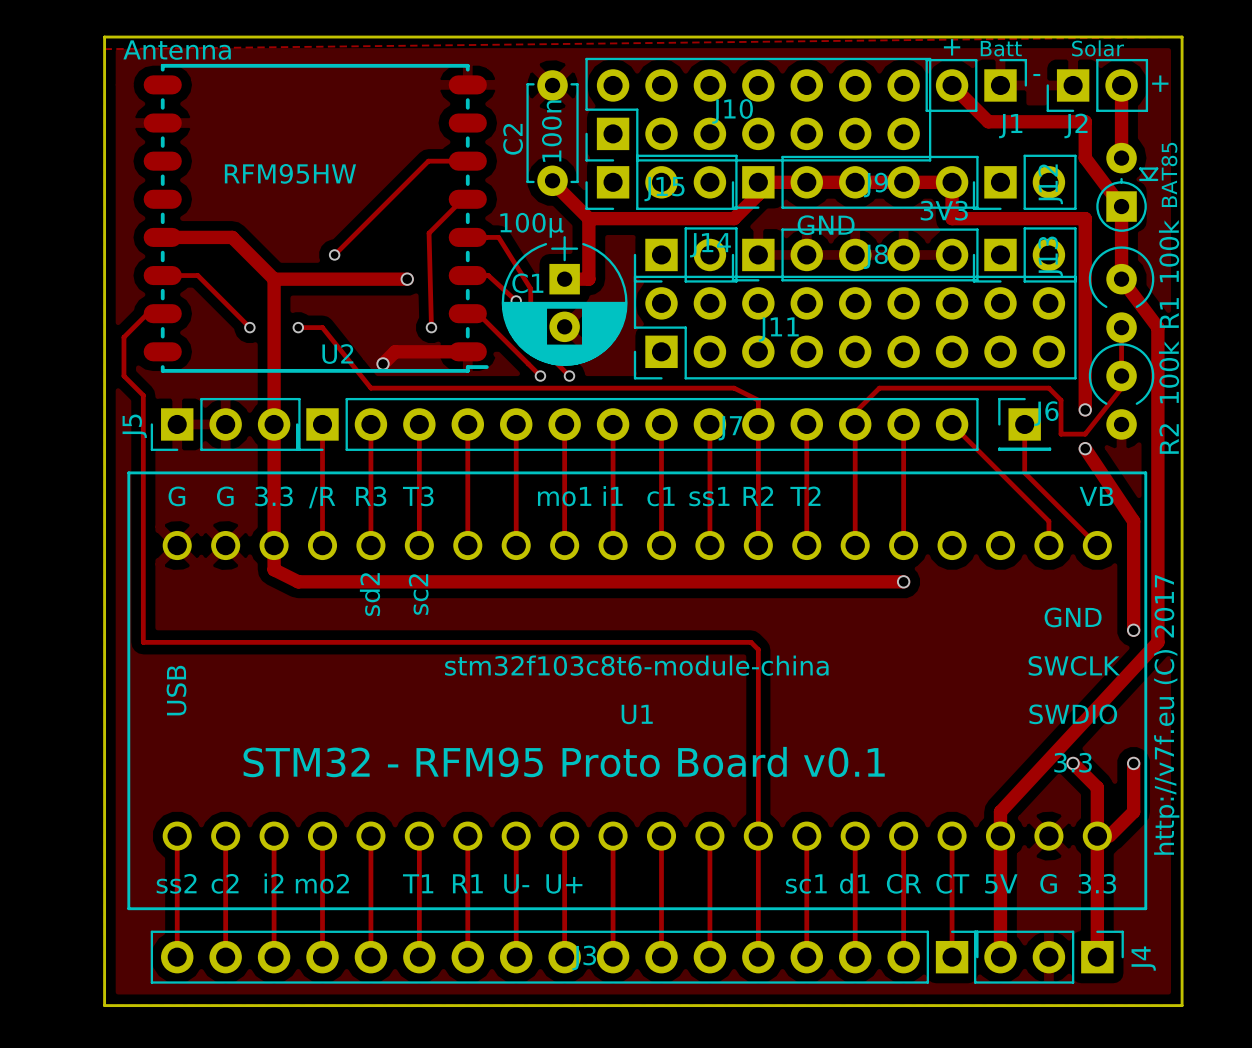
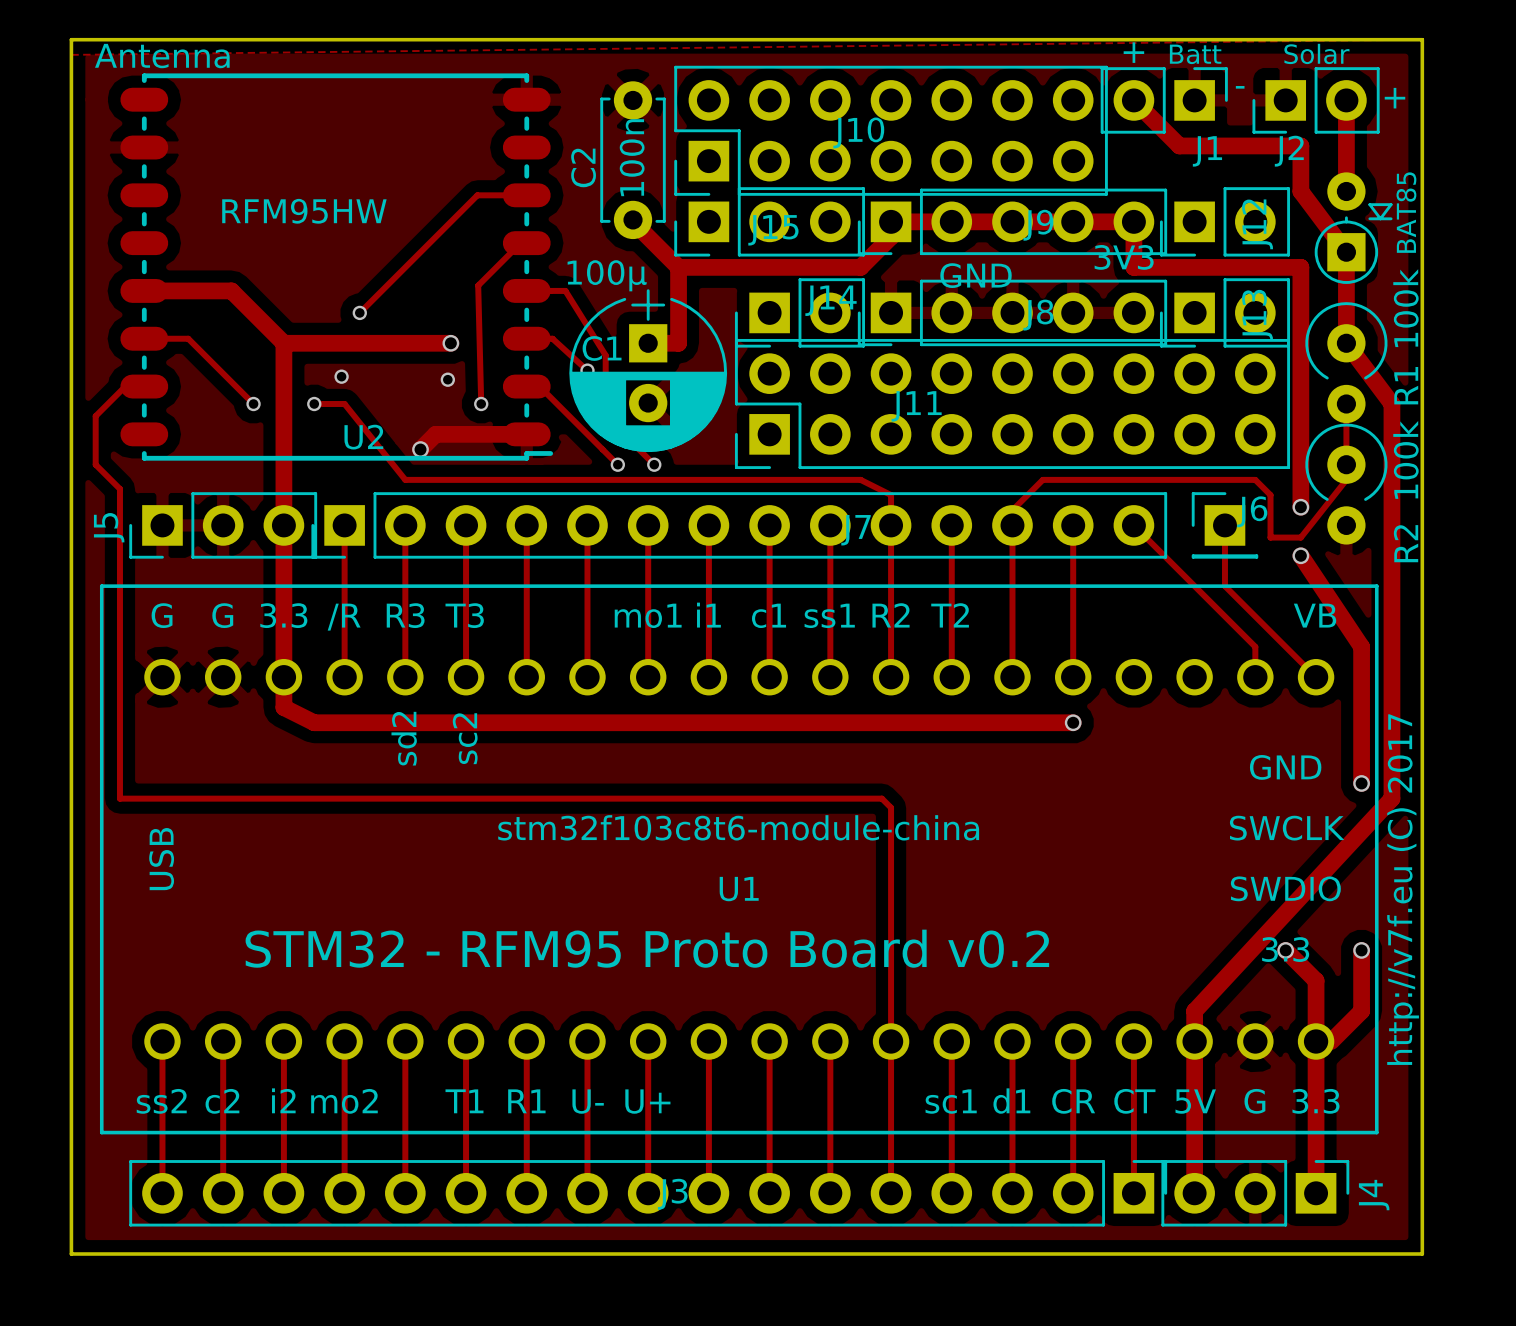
via: none -> (341, 376)
via: none -> (447, 379)
text: STM32 - RFM95 Proto Board v0.1 (564, 762) -> STM32 - RFM95 Proto Board v0.2 (647, 948)

